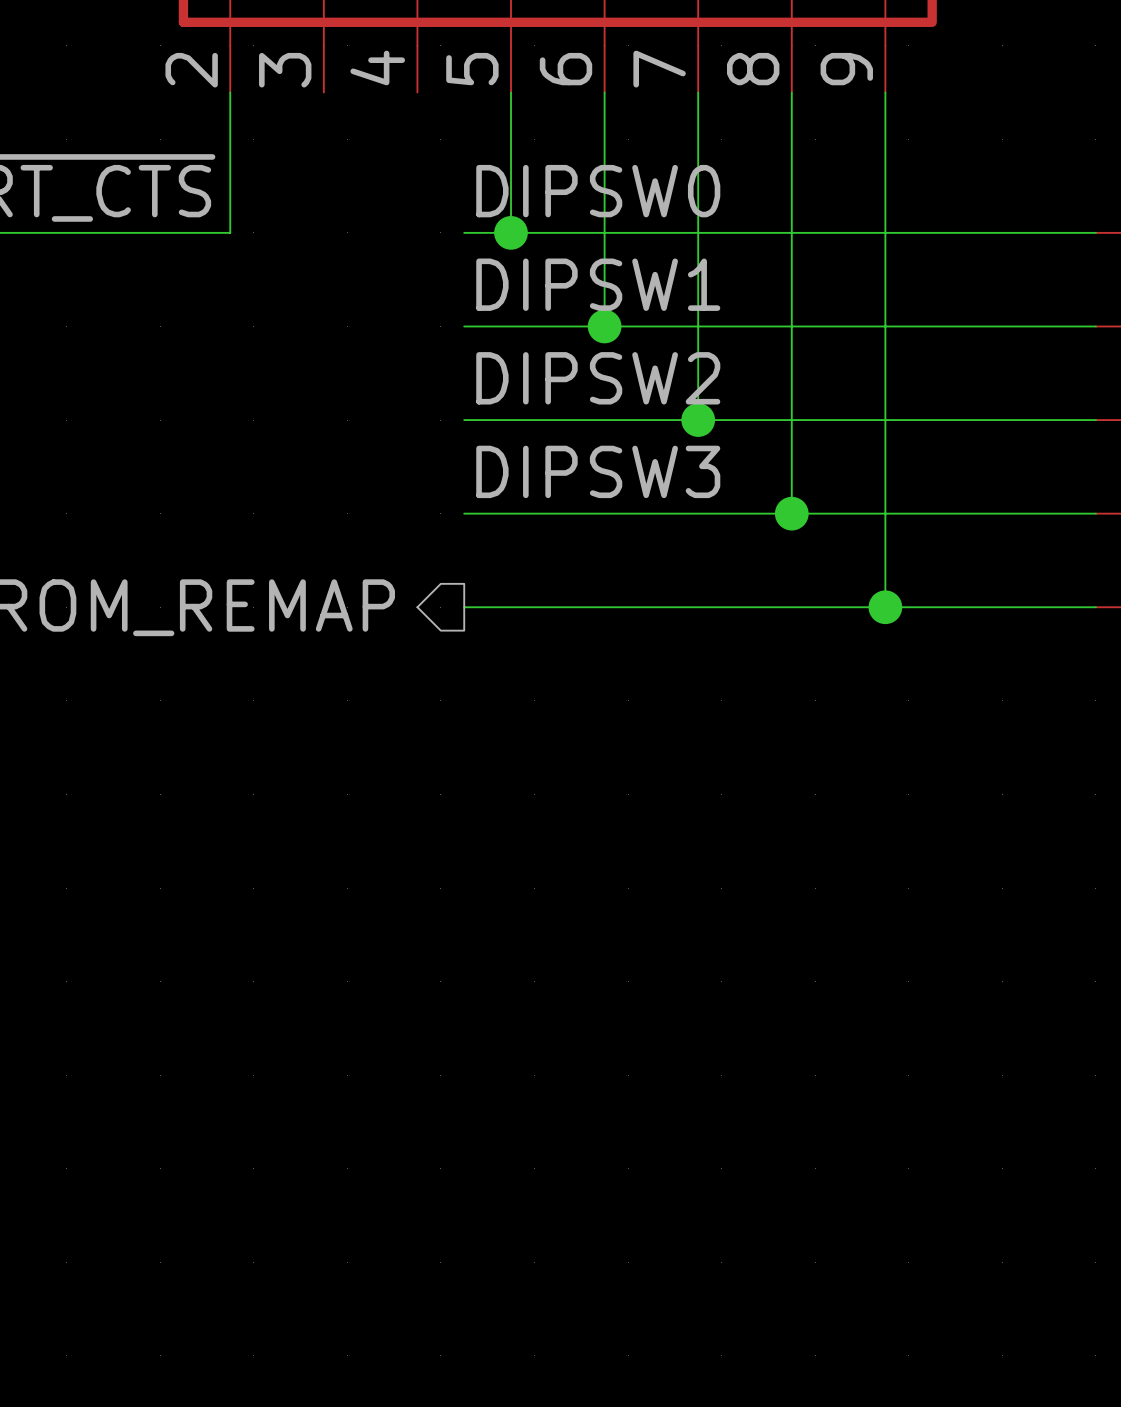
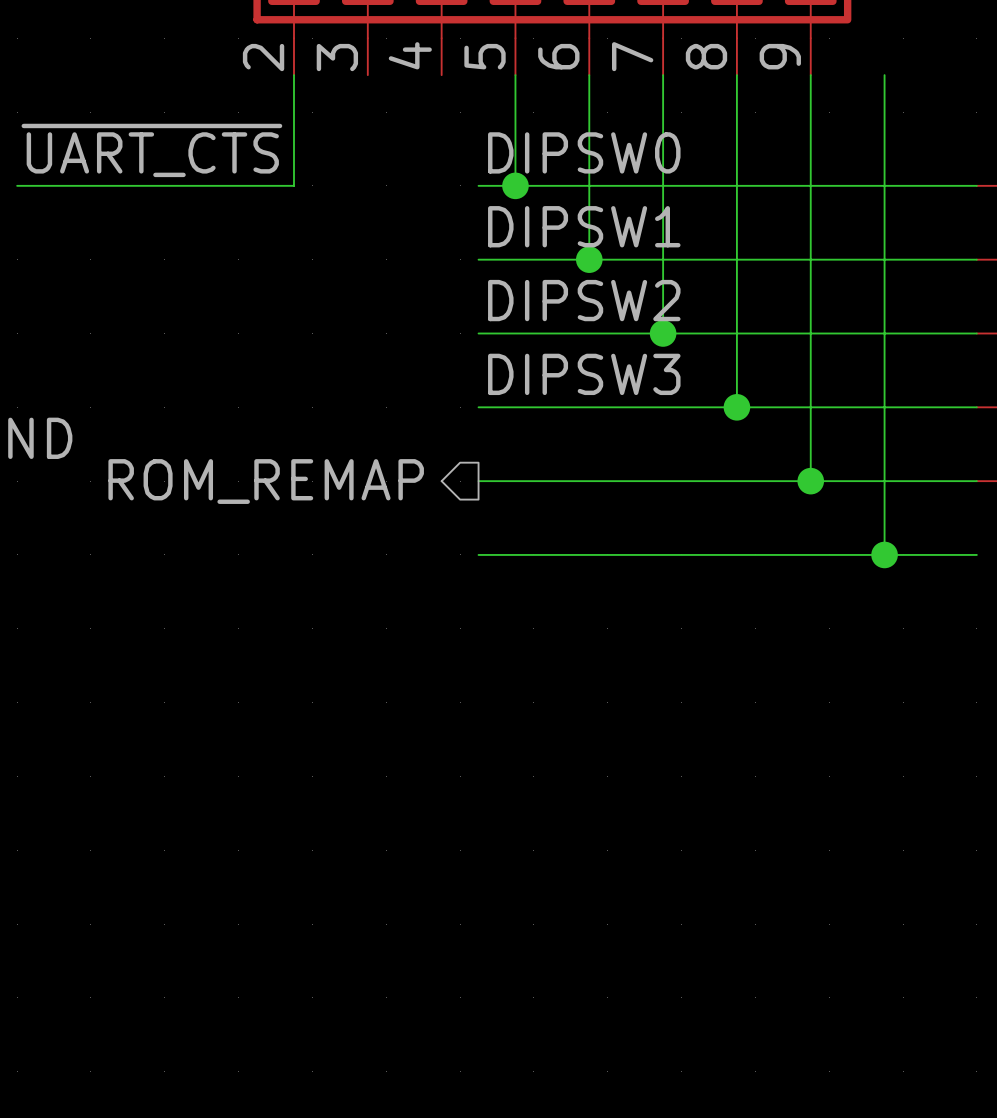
wire: none -> (884, 75) (884, 554)
wire: none -> (478, 554) (976, 554)
junction: none -> (884, 554)

